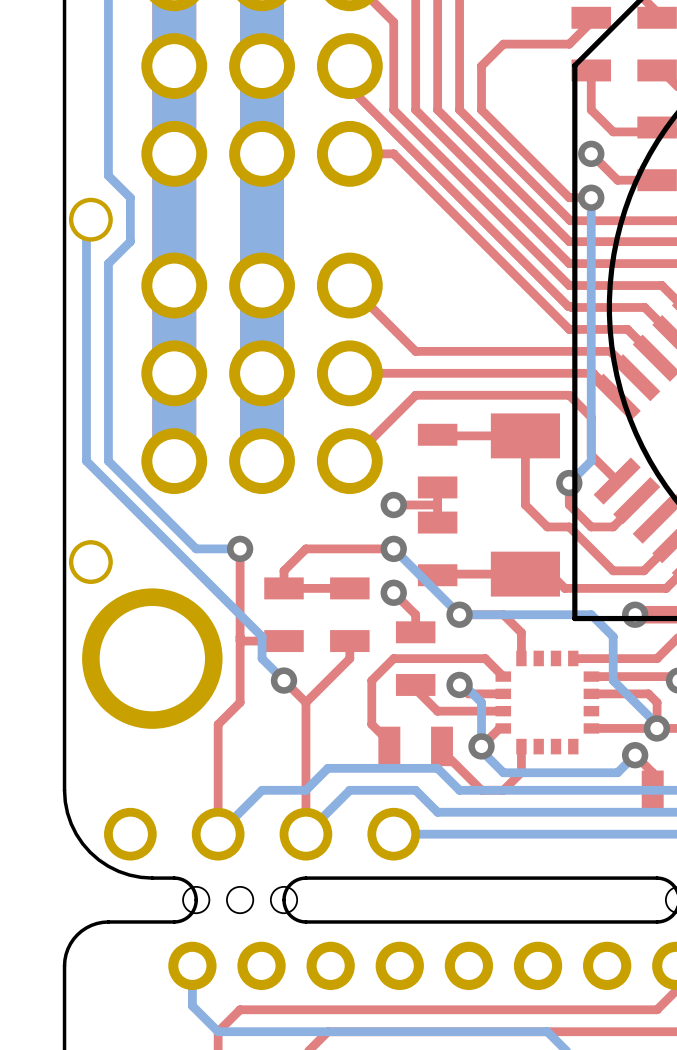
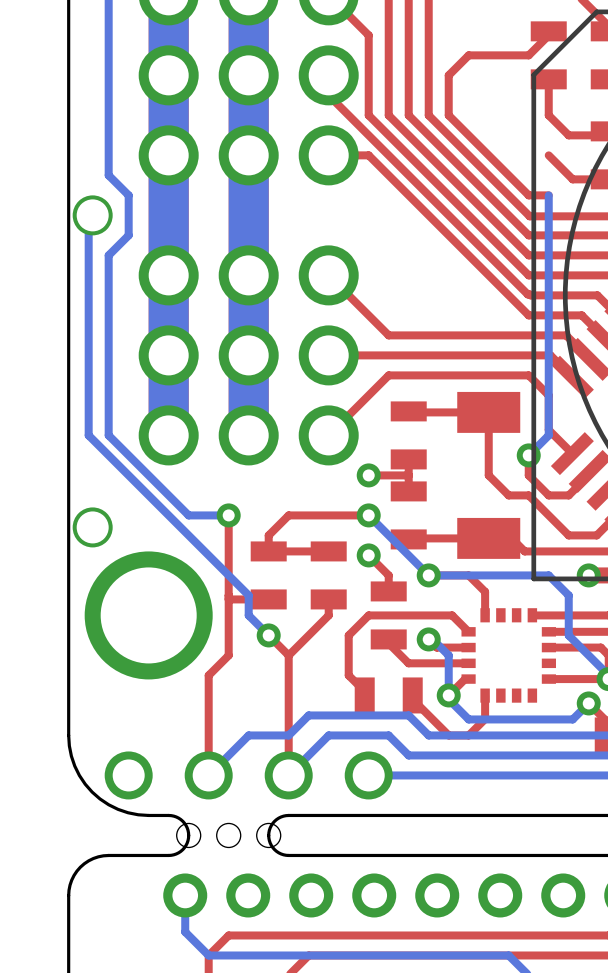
via: (591, 153) -> none
via: (591, 197) -> none

